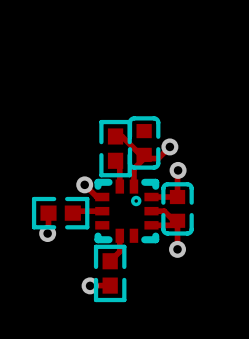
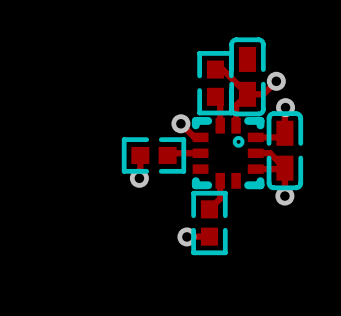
part footprint: [127, 116, 161, 170] -> [229, 37, 266, 117]
part footprint: [161, 182, 194, 236] -> [266, 111, 304, 191]

